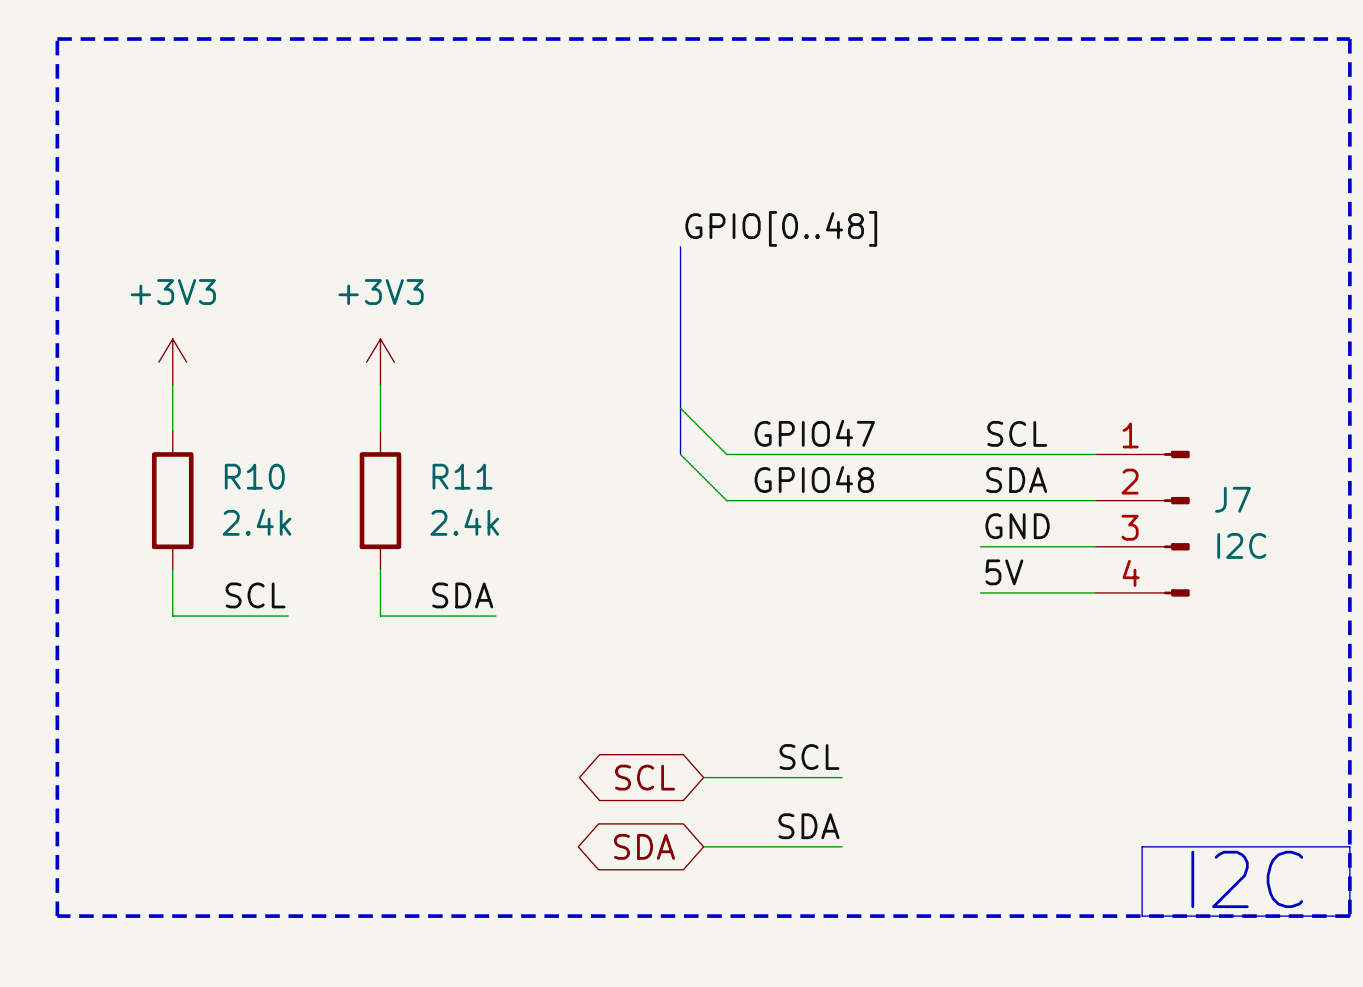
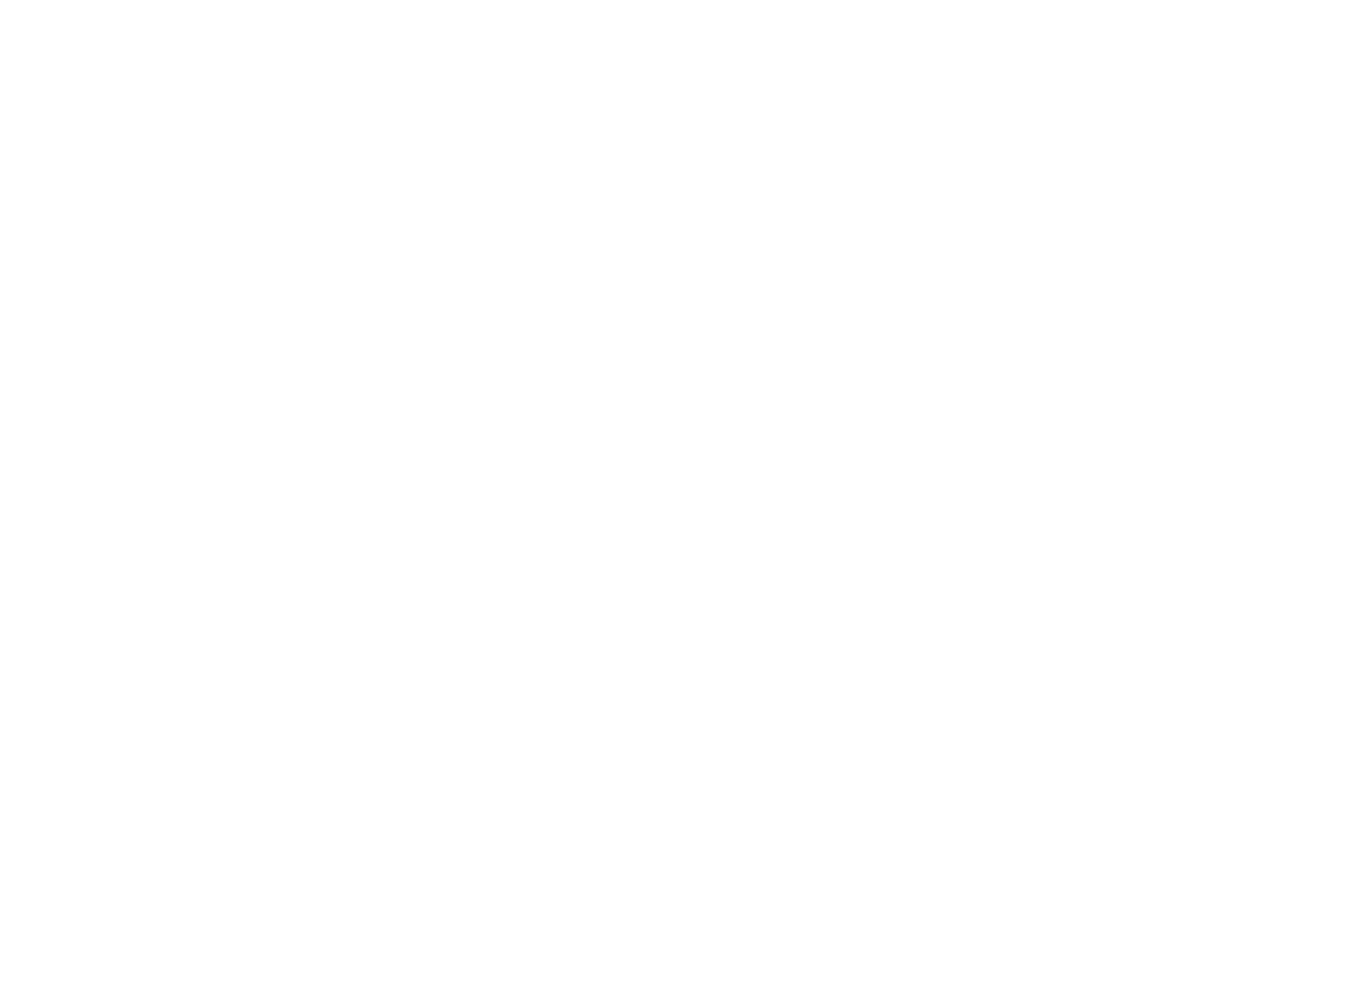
label: GPIO[0..48] (781, 228) -> none
bus: (680, 246) (680, 454) -> none
power symbol: +3V3 (172, 362) -> none
power symbol: +3V3 (380, 362) -> none
wire: (172, 385) (172, 431) -> none
wire: (380, 385) (380, 431) -> none
wire: (680, 408) (726, 454) (1095, 454) -> none
label: GPIO47 (814, 433) -> none
label: SCL (1017, 433) -> none
wire: (680, 454) (726, 500) (1095, 500) -> none
label: GPIO48 (814, 479) -> none
label: SDA (1016, 480) -> none
R10: 2.4k (172, 500) -> none
R11: 2.4k (380, 500) -> none
J7: I2C (1142, 523) -> none
label: GND (1017, 526) -> none
wire: (980, 546) (1095, 546) -> none
wire: (172, 569) (172, 616) (288, 616) -> none
wire: (380, 569) (380, 616) (495, 616) -> none
label: 5V (1004, 572) -> none
wire: (980, 592) (1095, 592) -> none
label: SCL (255, 595) -> none
label: SDA (462, 595) -> none
label: SCL (809, 757) -> none
global label: SCL (645, 777) -> none
wire: (703, 777) (842, 777) -> none
label: SDA (808, 826) -> none
global label: SDA (644, 846) -> none
wire: (703, 846) (842, 846) -> none
text: I2C (1247, 879) -> none
line: (1349, 916) (1349, 39) (57, 39) (57, 916) (1349, 916) -> none
line: (1349, 916) (1349, 846) (1142, 846) (1142, 916) (1349, 916) -> none

